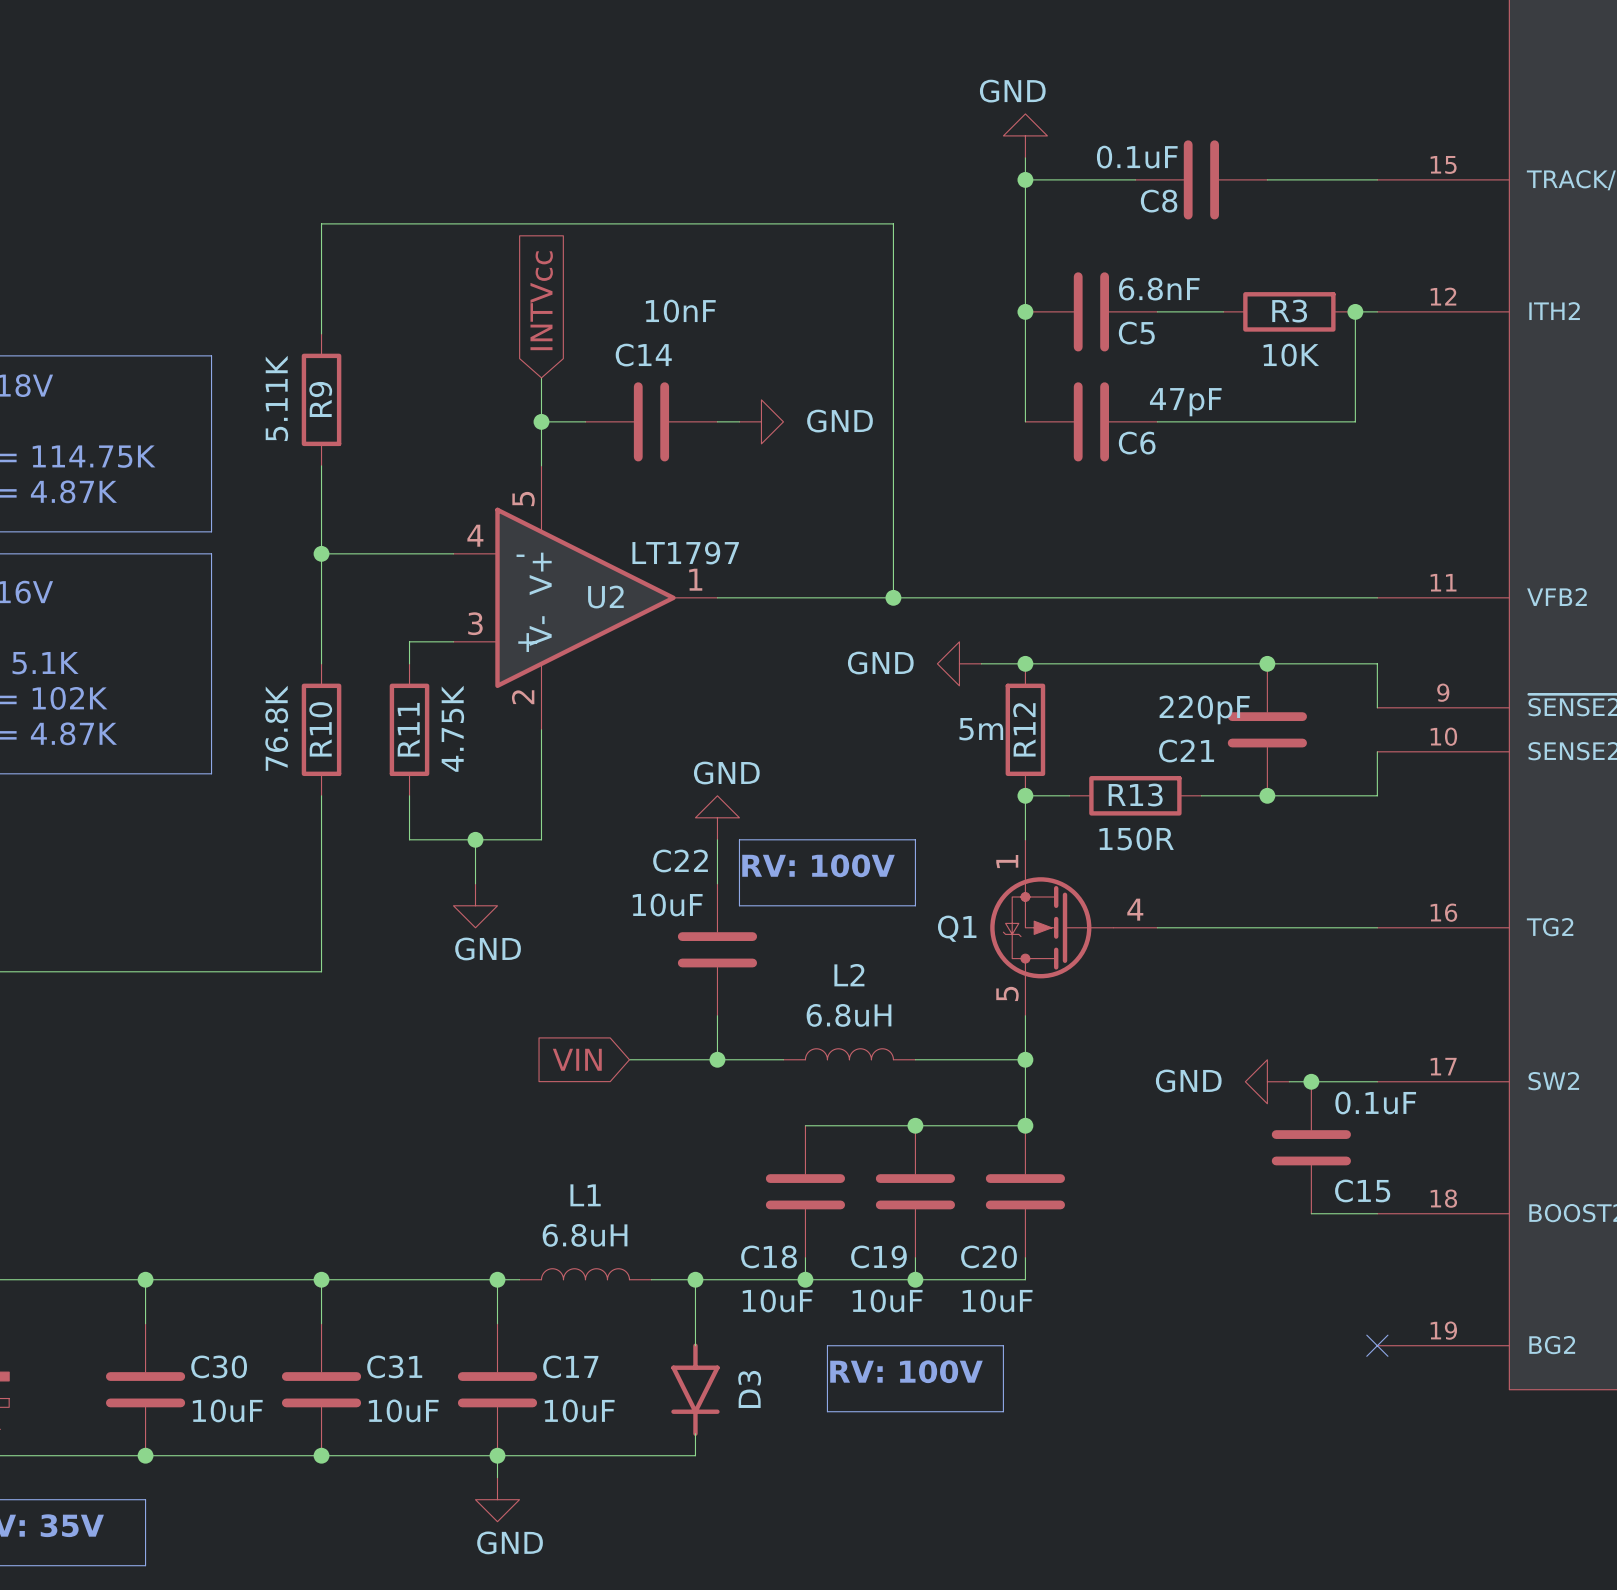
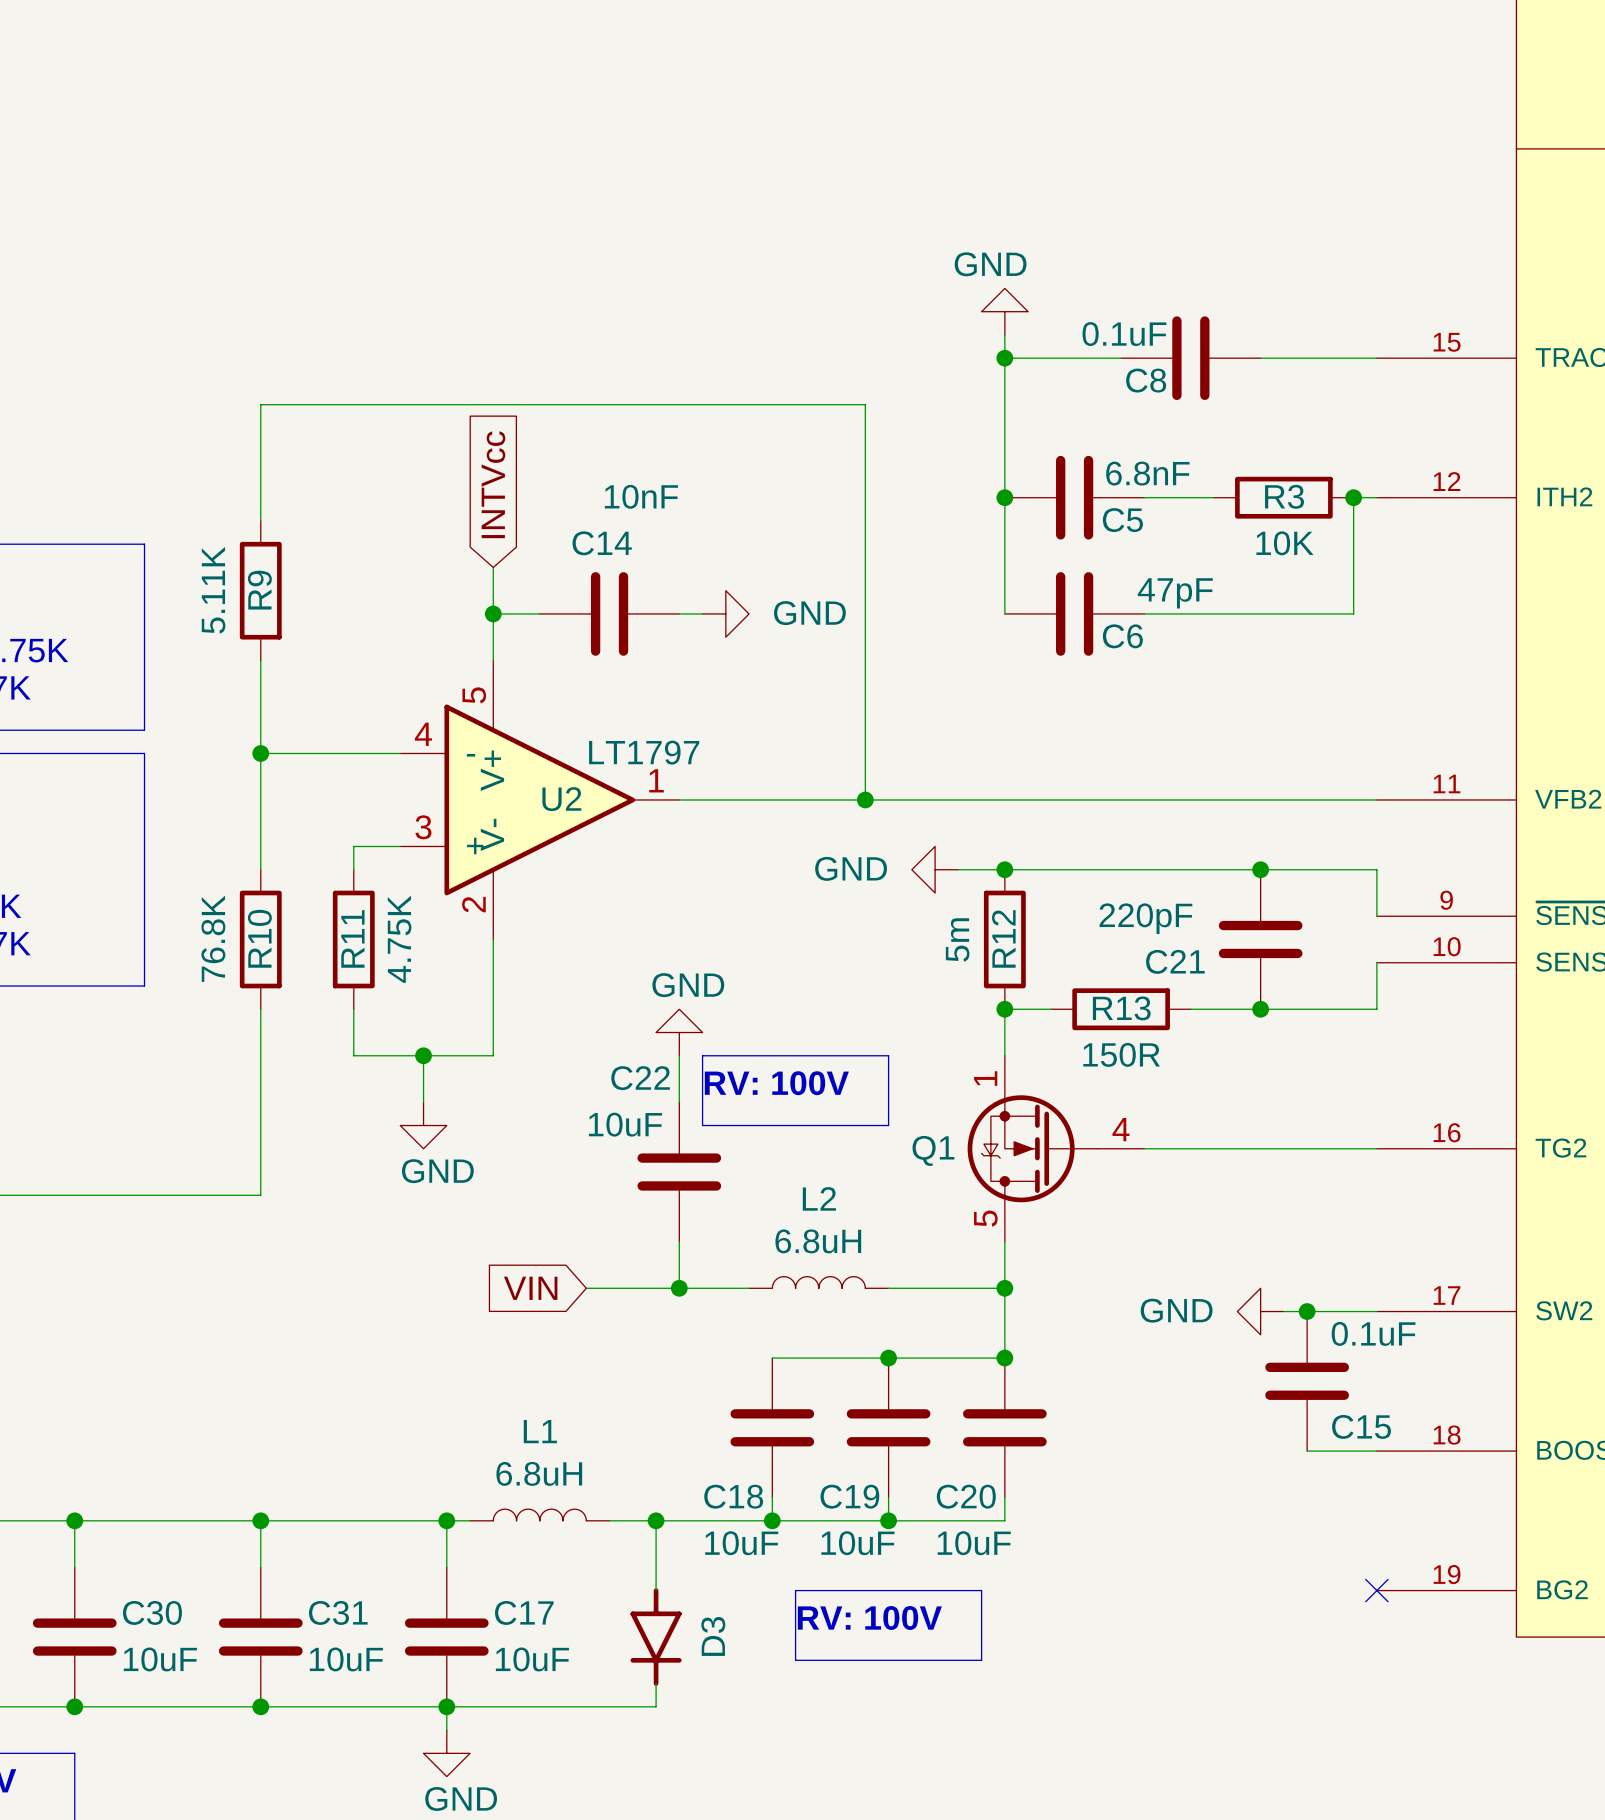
C21 value position: 220pF (1204, 709) -> 220pF (1145, 918)
R12 value rotation: 0° (981, 729) -> 90° counterclockwise (957, 939)

